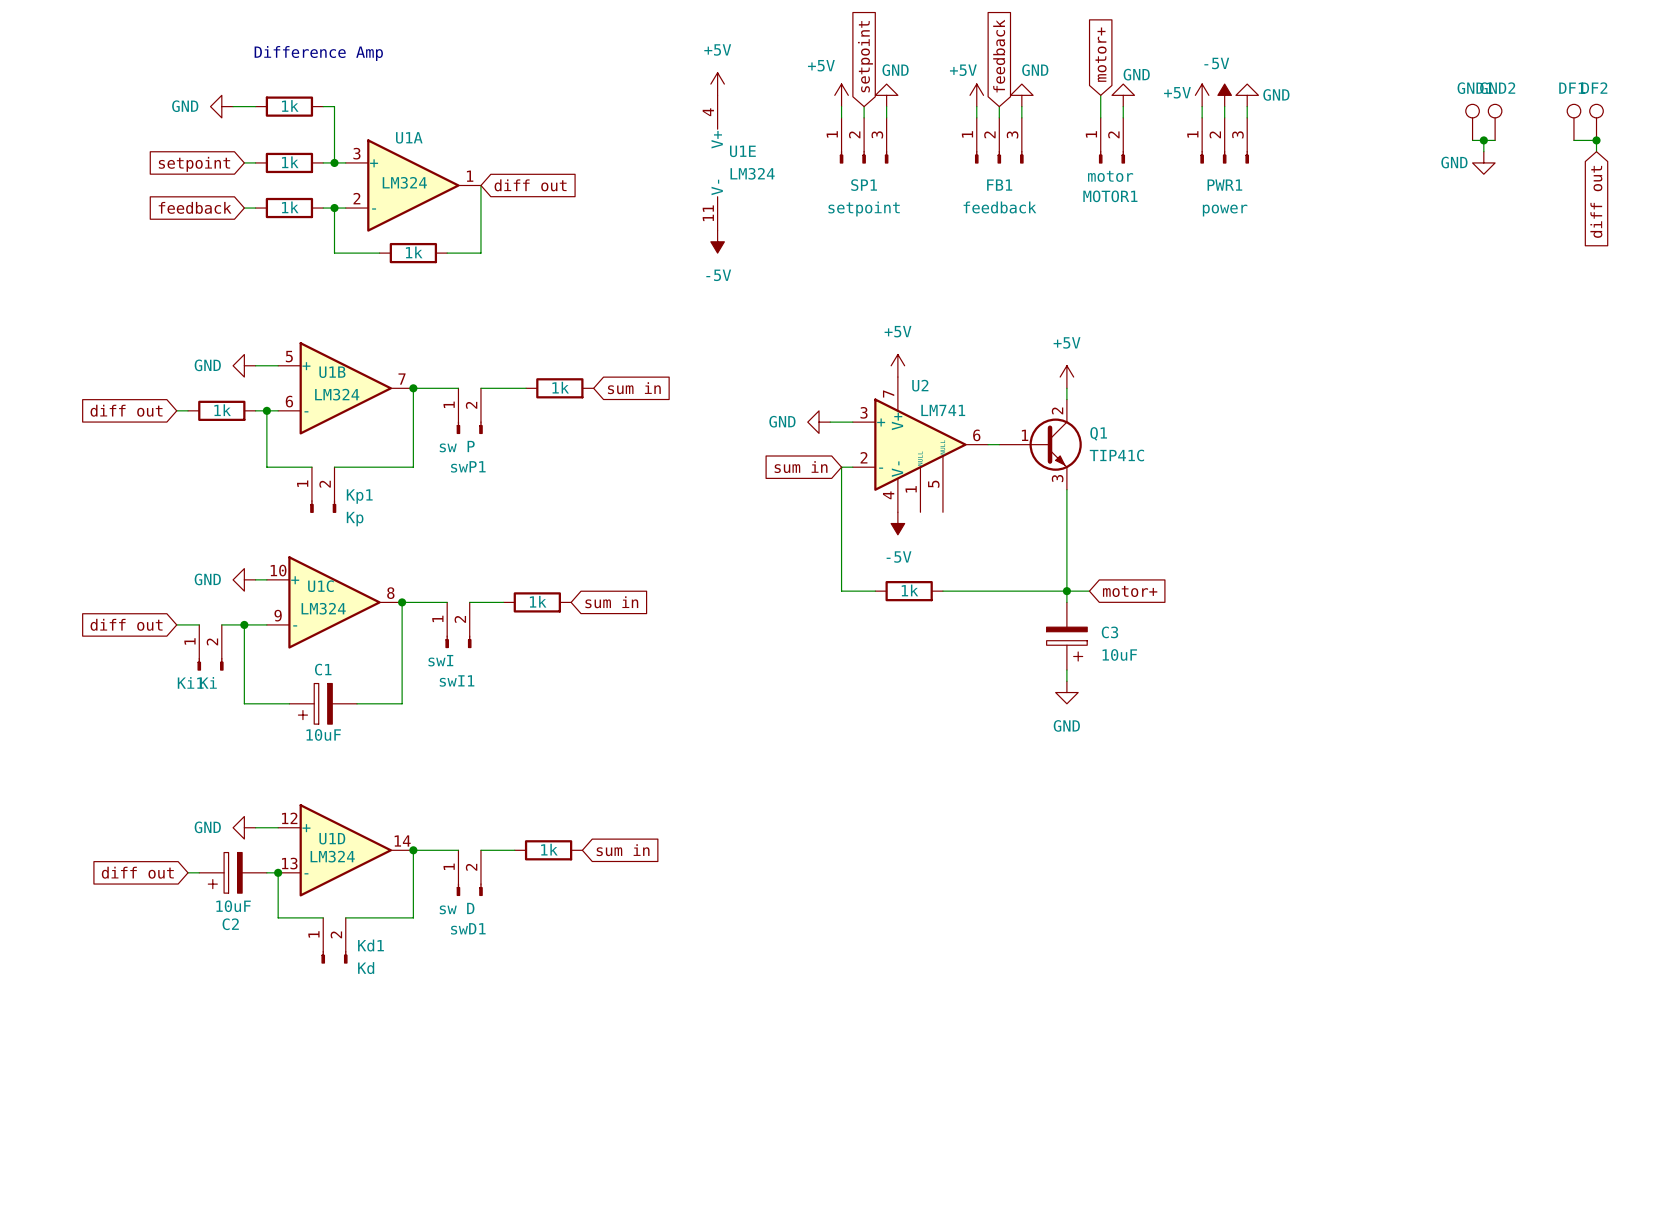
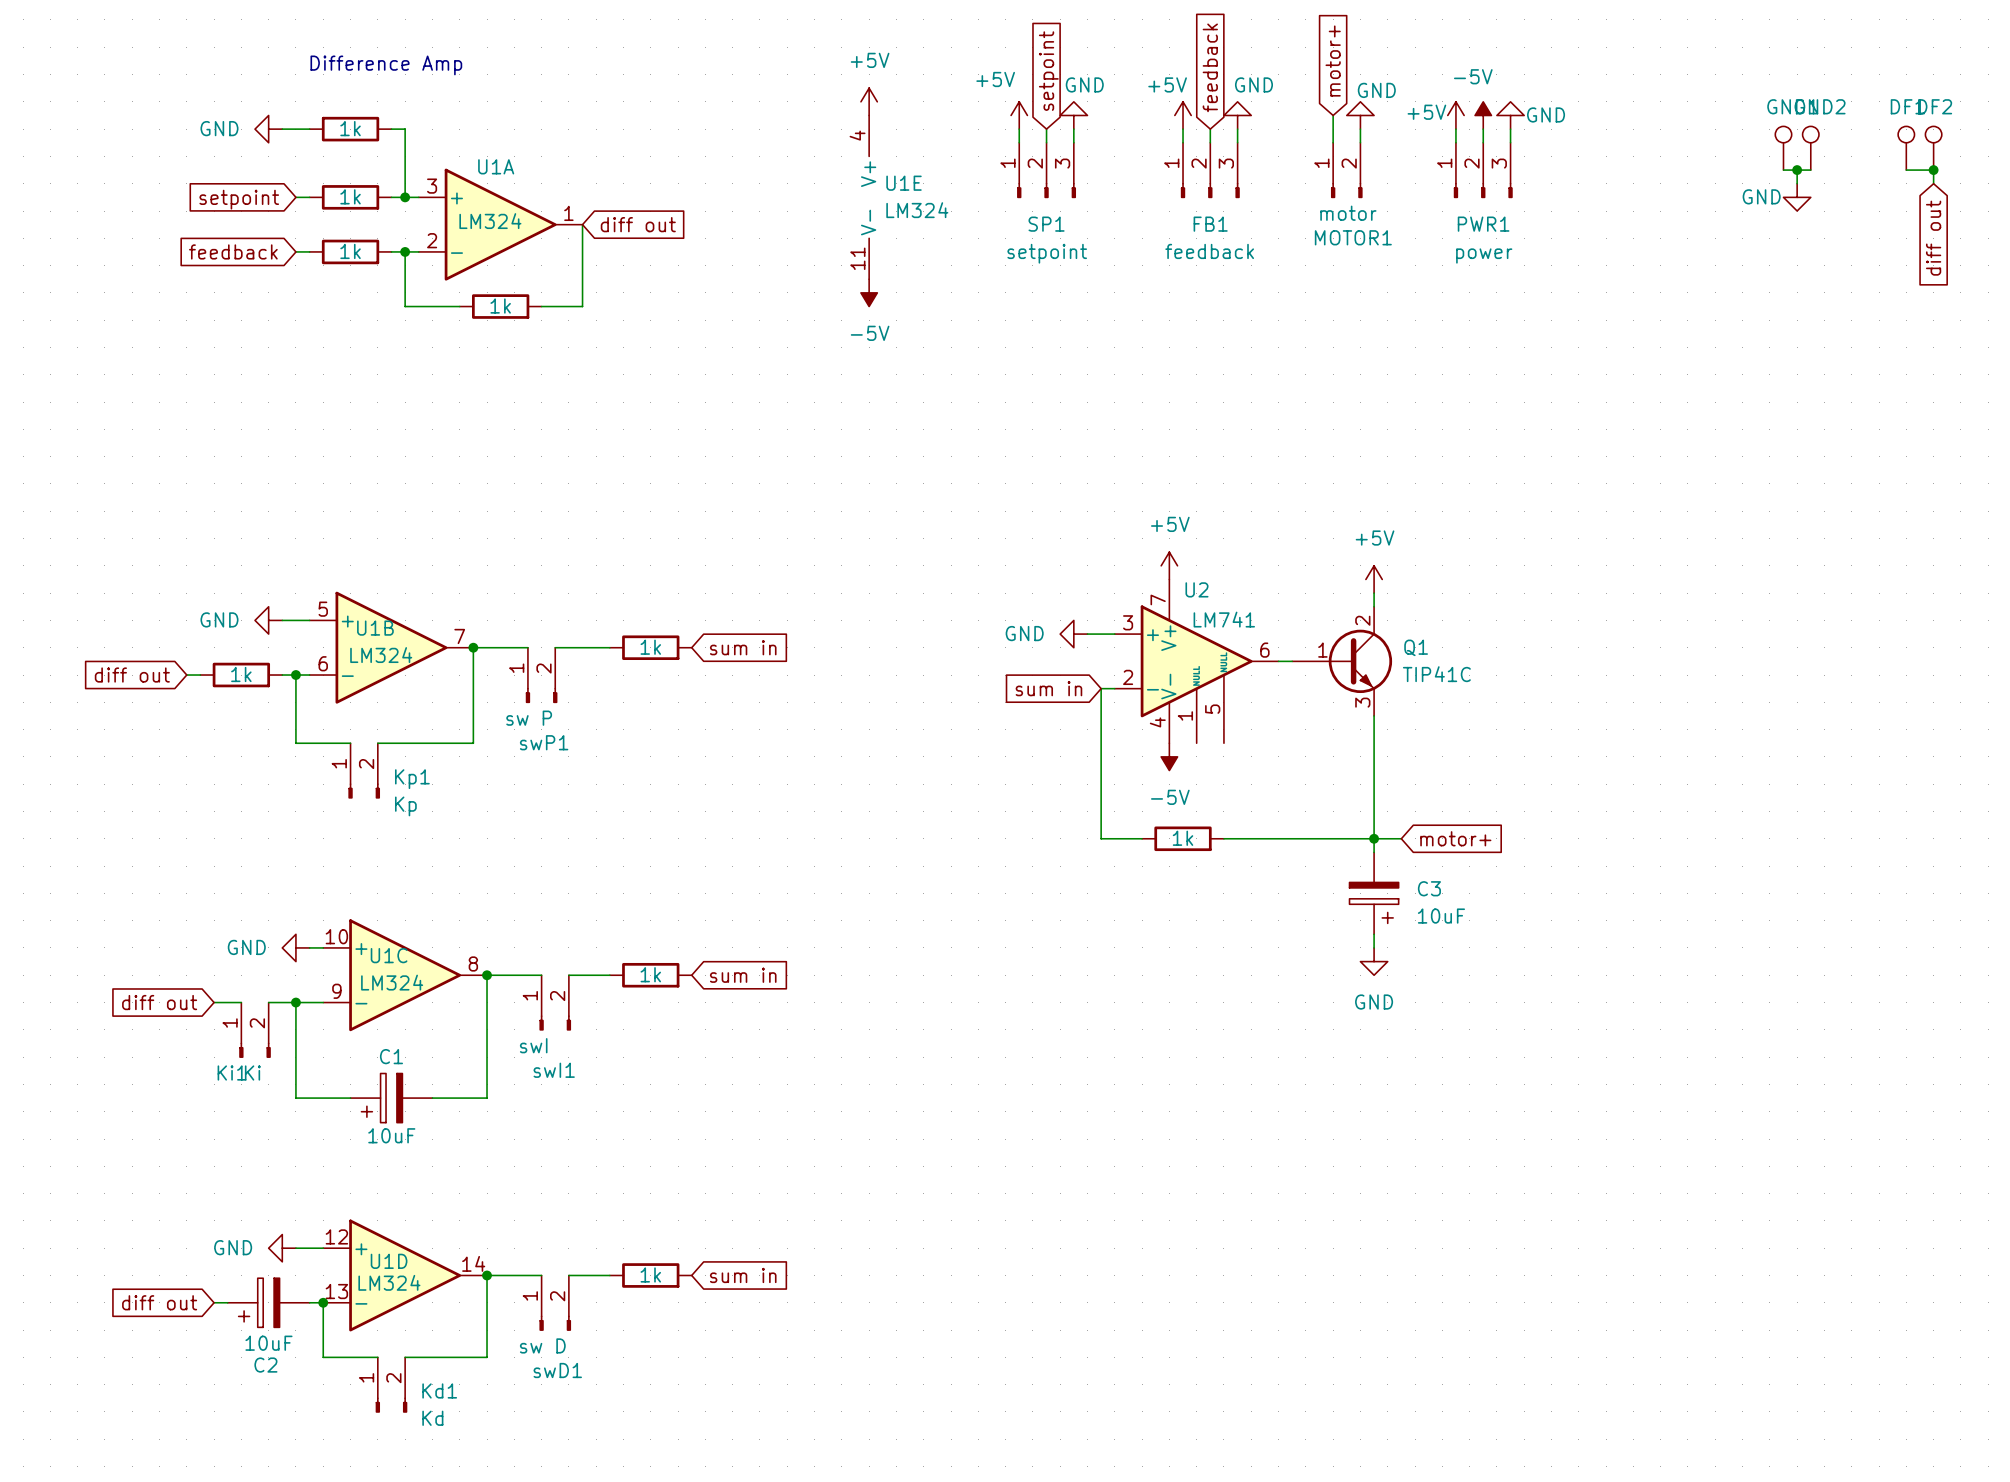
power symbol: GND (244, 365) -> none
wire: (255, 365) (278, 365) -> (282, 620) (309, 620)
power symbol: +5V (897, 365) -> none
power symbol: +5V (1066, 377) -> none
U1B position: (345, 388) -> (391, 647)
junction: (413, 388) -> none
wire: (458, 388) (413, 388) (413, 467) (334, 467) -> (527, 647) (473, 647) (473, 743) (377, 743)
wire: (480, 388) (526, 388) -> (555, 647) (609, 647)
part: 1k (559, 388) -> none
global label: sum in (634, 388) -> none
wire: (1066, 388) (1066, 399) -> (1374, 593) (1374, 606)
global label: diff out (126, 410) -> none
wire: (176, 410) (188, 410) -> (186, 675) (200, 675)
part position: (221, 410) -> (241, 675)
wire: (255, 410) (278, 410) -> (282, 675) (309, 675)
wire: (266, 410) (266, 467) (311, 467) -> (295, 675) (295, 743) (350, 743)
junction: (266, 410) -> none
swP1 position: (469, 411) -> (541, 675)
power symbol position: GND (819, 422) -> GND (1073, 634)
wire: (830, 422) (852, 422) -> (1087, 634) (1114, 634)
U2 position: (920, 444) -> (1196, 661)
wire: (988, 444) (999, 444) -> (1278, 661) (1292, 661)
Q1 position: (1040, 444) -> (1342, 661)
global label position: sum in (801, 467) -> sum in (1048, 688)
wire: (852, 467) (841, 467) (841, 591) (875, 591) -> (1114, 688) (1101, 688) (1101, 838) (1142, 838)
power symbol: none -> +5V (1169, 565)
power symbol: none -> +5V (1374, 579)
wire: (1066, 489) (1066, 602) -> (1374, 715) (1374, 852)
Kp1 position: (323, 490) -> (364, 770)
power symbol position: -5V (897, 523) -> -5V (1169, 756)
junction: none -> (473, 647)
junction: none -> (295, 675)
power symbol position: GND (244, 579) -> GND (268, 620)
wire: (255, 579) (266, 579) -> (309, 947) (323, 947)
part position: (909, 591) -> (1183, 838)
wire: (942, 591) (1089, 591) -> (1223, 838) (1401, 838)
junction: (1066, 591) -> none
global label position: motor+ (1130, 591) -> motor+ (1455, 838)
U1C position: (334, 602) -> (405, 975)
junction: (402, 602) -> none
wire: (447, 602) (402, 602) (402, 703) (357, 703) -> (541, 975) (487, 975) (487, 1098) (432, 1098)
wire: (469, 602) (503, 602) -> (568, 975) (609, 975)
part position: (537, 602) -> (650, 647)
global label position: sum in (611, 602) -> sum in (743, 647)
global label position: diff out (126, 624) -> diff out (132, 675)
wire: (176, 624) (199, 624) -> (214, 1002) (241, 1002)
wire: (221, 624) (266, 624) -> none
wire: (244, 624) (244, 703) (289, 703) -> (295, 1002) (295, 1098) (350, 1098)
junction: (244, 624) -> none
swI1 position: (458, 625) -> (555, 1002)
C3 position: (1066, 636) -> (1374, 893)
Ki1 position: (210, 647) -> (255, 1030)
wire: (1066, 670) (1066, 681) -> (1374, 934) (1374, 947)
power symbol position: GND (1066, 692) -> GND (1374, 961)
junction: none -> (1374, 838)
C1 position: (323, 703) -> (391, 1098)
wire: none -> (268, 1002) (309, 1002)
junction: none -> (295, 1002)
power symbol position: GND (244, 827) -> GND (295, 947)
U1D position: (345, 850) -> (405, 1275)
junction position: (413, 850) -> (487, 975)
wire: (458, 850) (413, 850) (413, 917) (345, 917) -> (541, 1275) (487, 1275) (487, 1357) (405, 1357)
wire: (480, 850) (514, 850) -> (568, 1275) (609, 1275)
part position: (548, 850) -> (650, 975)
global label position: sum in (623, 850) -> sum in (743, 975)
global label position: diff out (137, 872) -> diff out (159, 1002)
wire: (188, 872) (199, 872) -> (214, 1302) (227, 1302)
C2 position: (233, 872) -> (268, 1302)
wire: (266, 872) (278, 872) (278, 917) (323, 917) -> (309, 1302) (323, 1302) (323, 1357) (377, 1357)
junction: (278, 872) -> none
swD1 position: (469, 873) -> (555, 1303)
Kd1 position: (334, 940) -> (391, 1385)
power symbol: none -> GND (282, 1248)
wire: none -> (295, 1248) (323, 1248)
global label: none -> sum in (743, 1275)
junction: none -> (487, 1275)
part: none -> 1k (650, 1275)
global label: none -> diff out (159, 1302)
junction: none -> (323, 1302)

